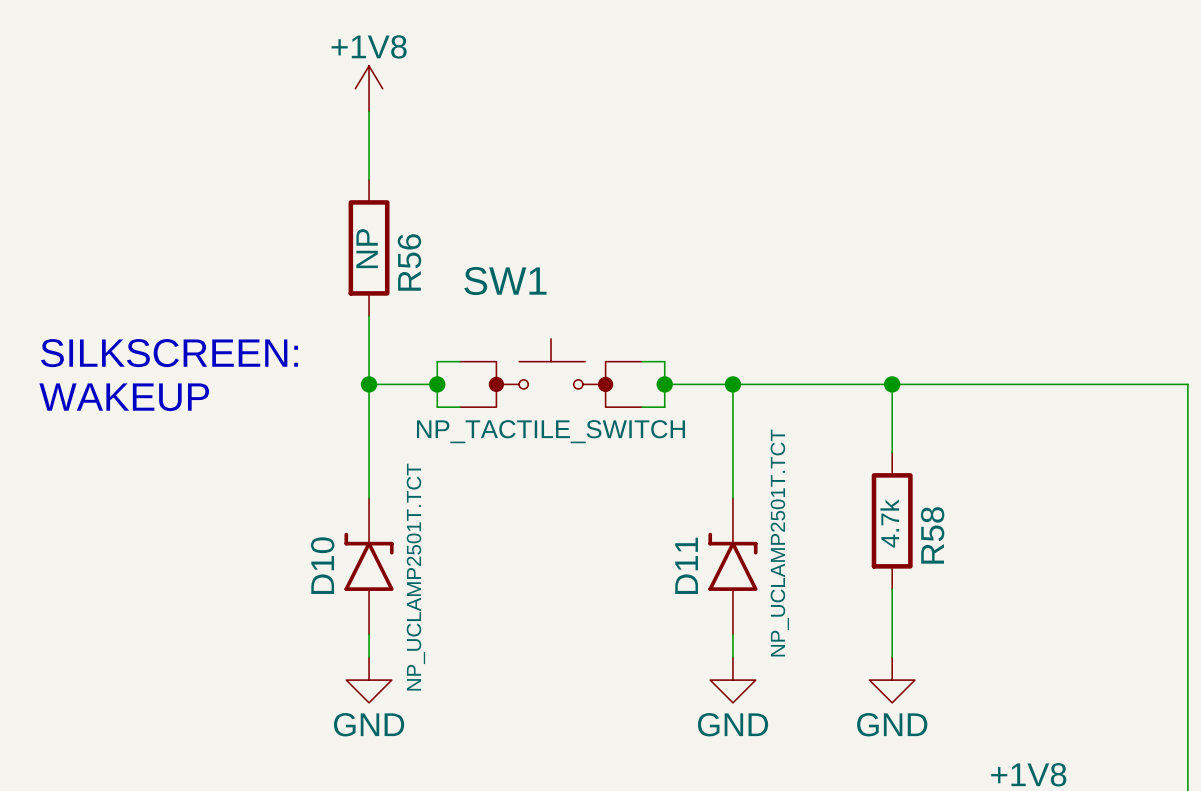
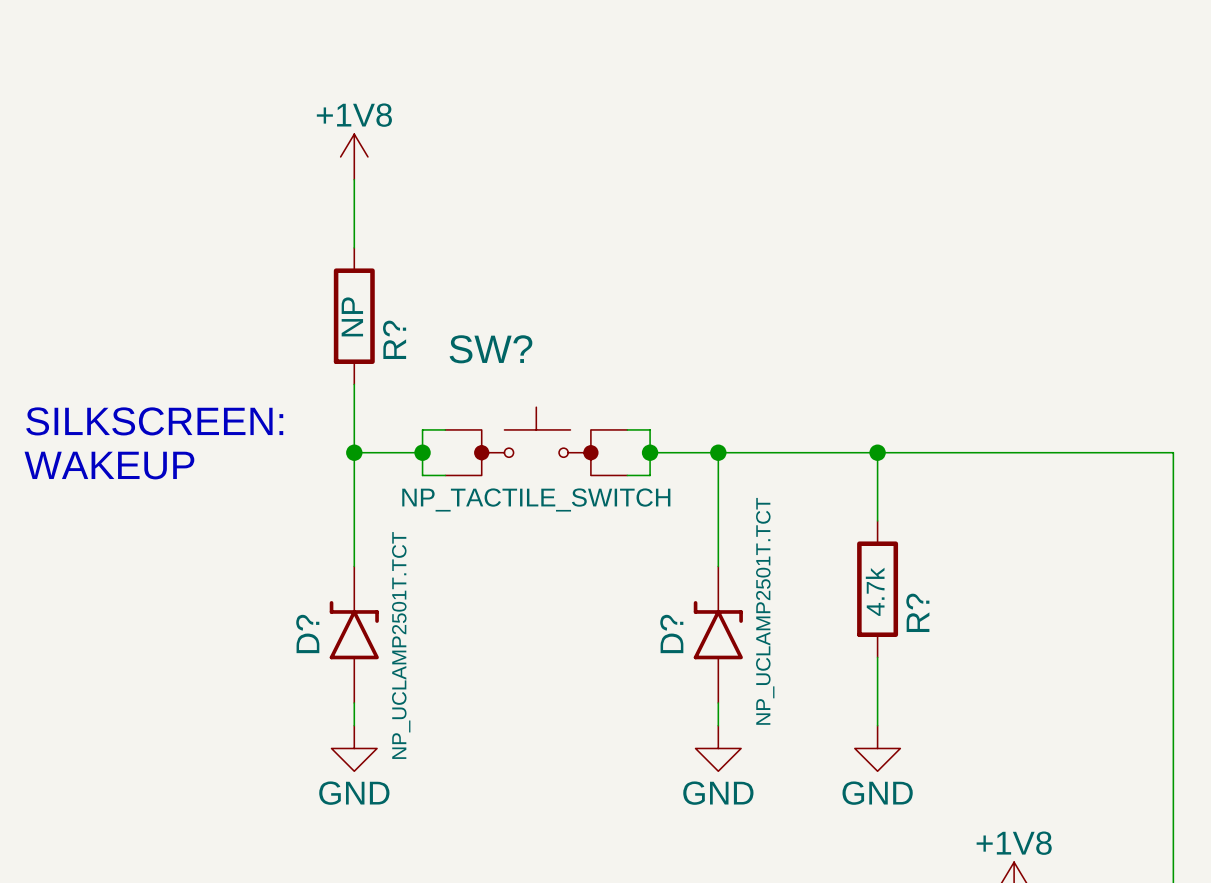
R56 name: R56 (409, 262) -> R? (394, 339)
SW1 name: SW1 (505, 281) -> SW? (490, 349)
R58 name: R58 (932, 535) -> R? (917, 612)
D10 name: D10 (322, 565) -> D? (307, 633)
D11 name: D11 (686, 565) -> D? (671, 633)

